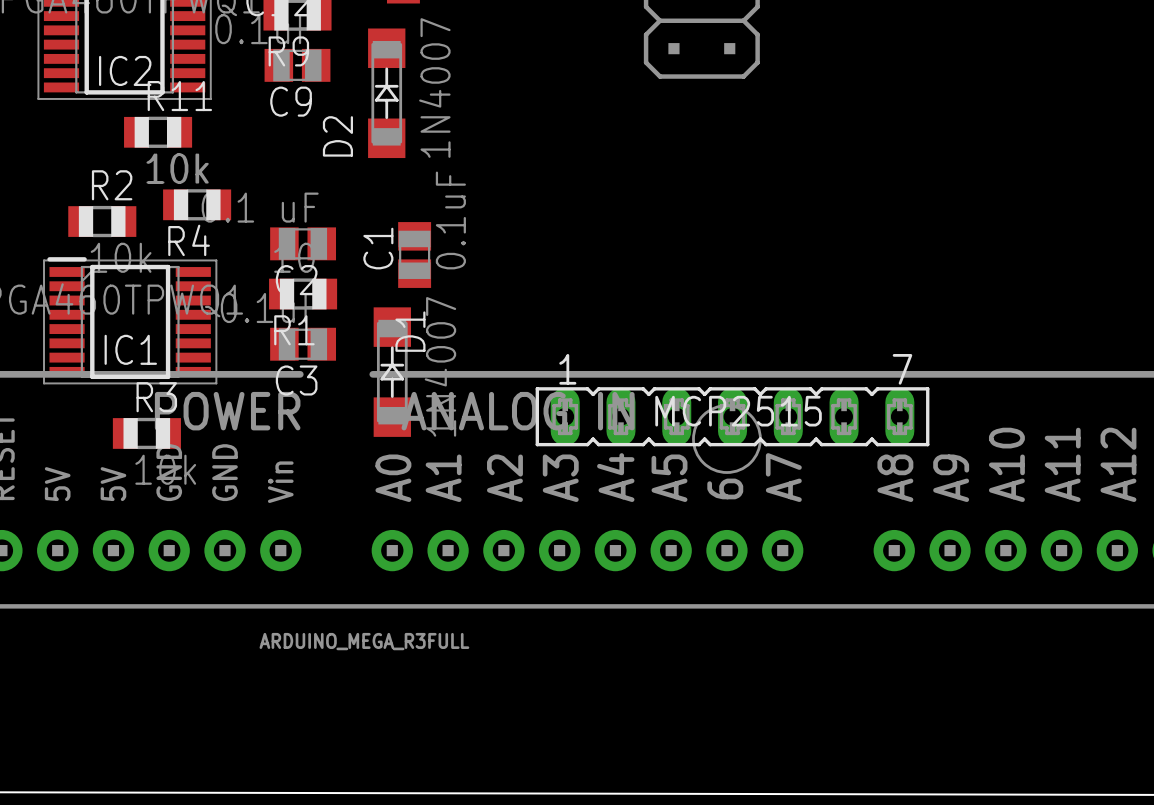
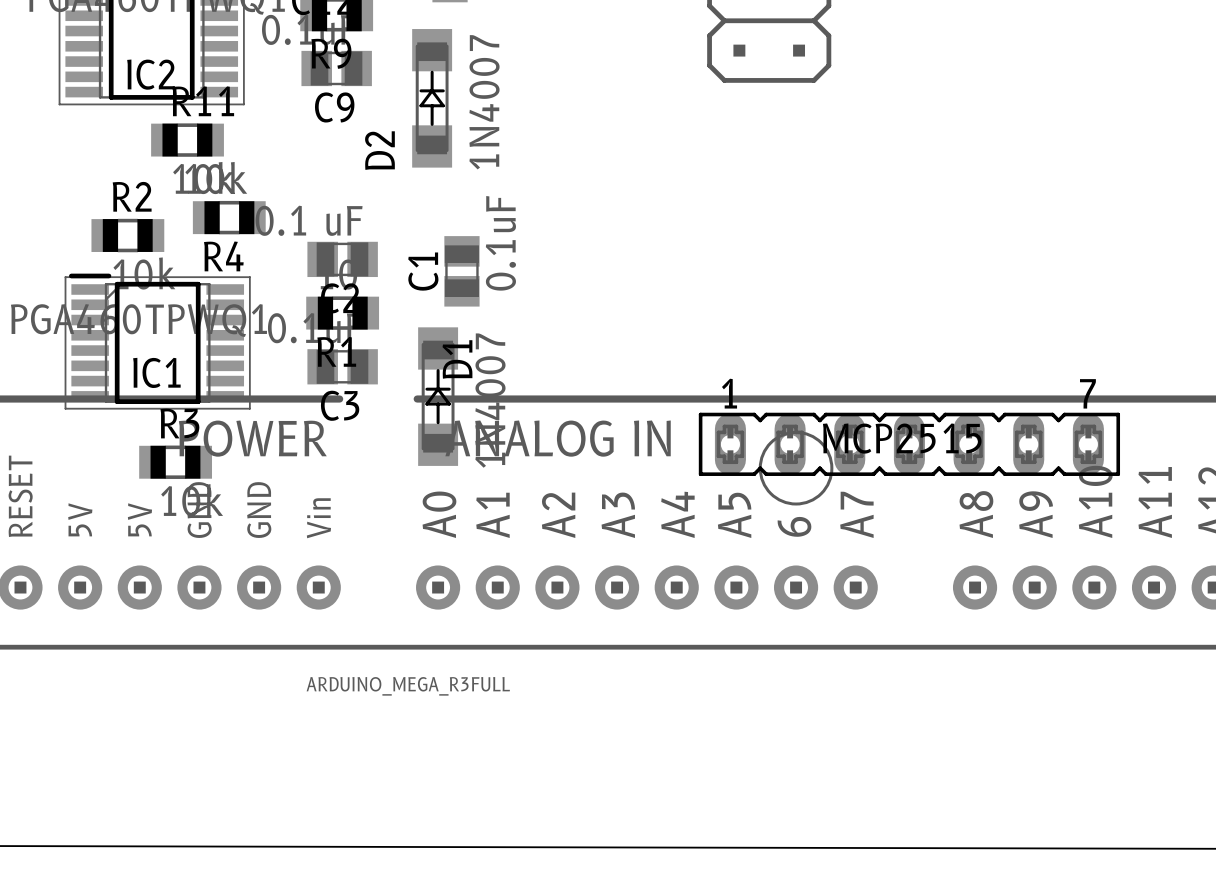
MCP2515 position: (732, 416) -> (909, 444)

